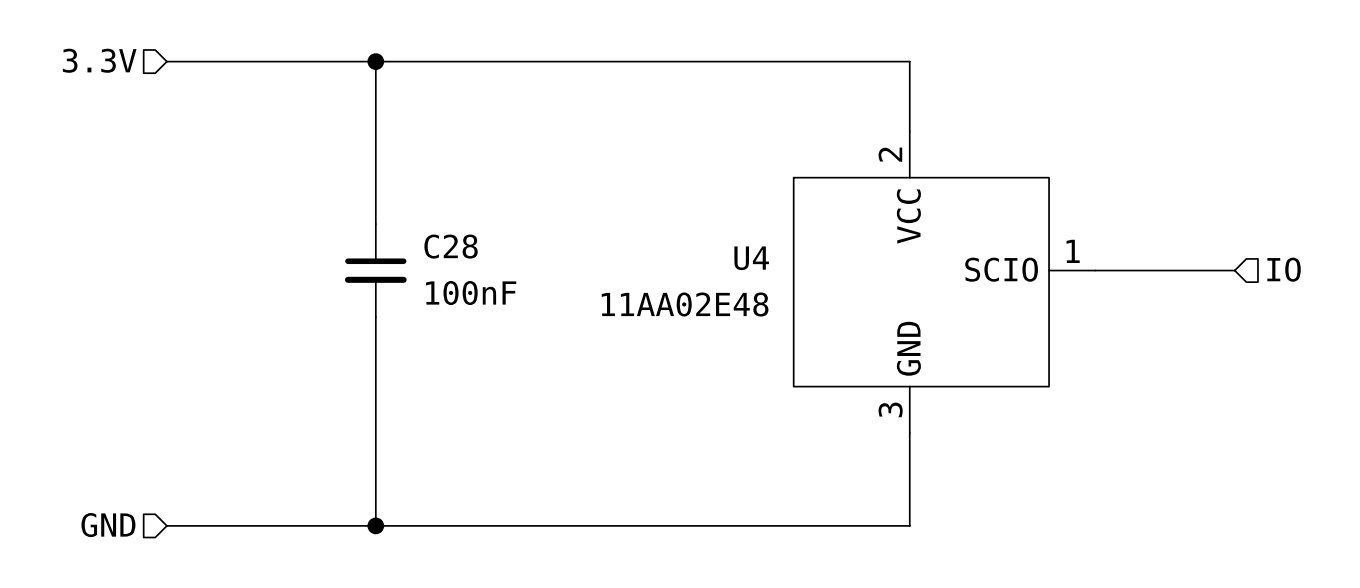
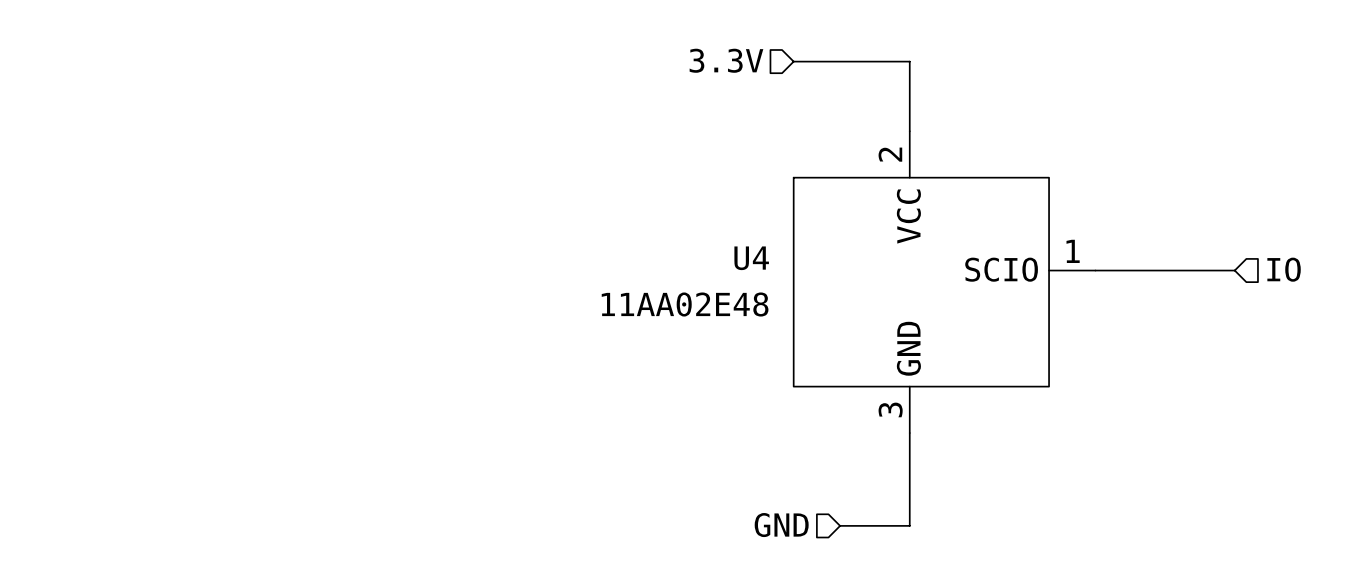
hierarchical label: 3.3V (99, 60) -> none
hierarchical label: none -> 3.3V (726, 60)
wire: (166, 61) (793, 61) -> none
wire: (375, 61) (375, 224) -> none
junction: (375, 61) -> none
C28: 100nF (375, 270) -> none
wire: (375, 316) (375, 525) -> none
hierarchical label: GND (108, 525) -> none
wire: (166, 525) (840, 525) -> none
junction: (375, 525) -> none
hierarchical label: none -> GND (781, 525)

